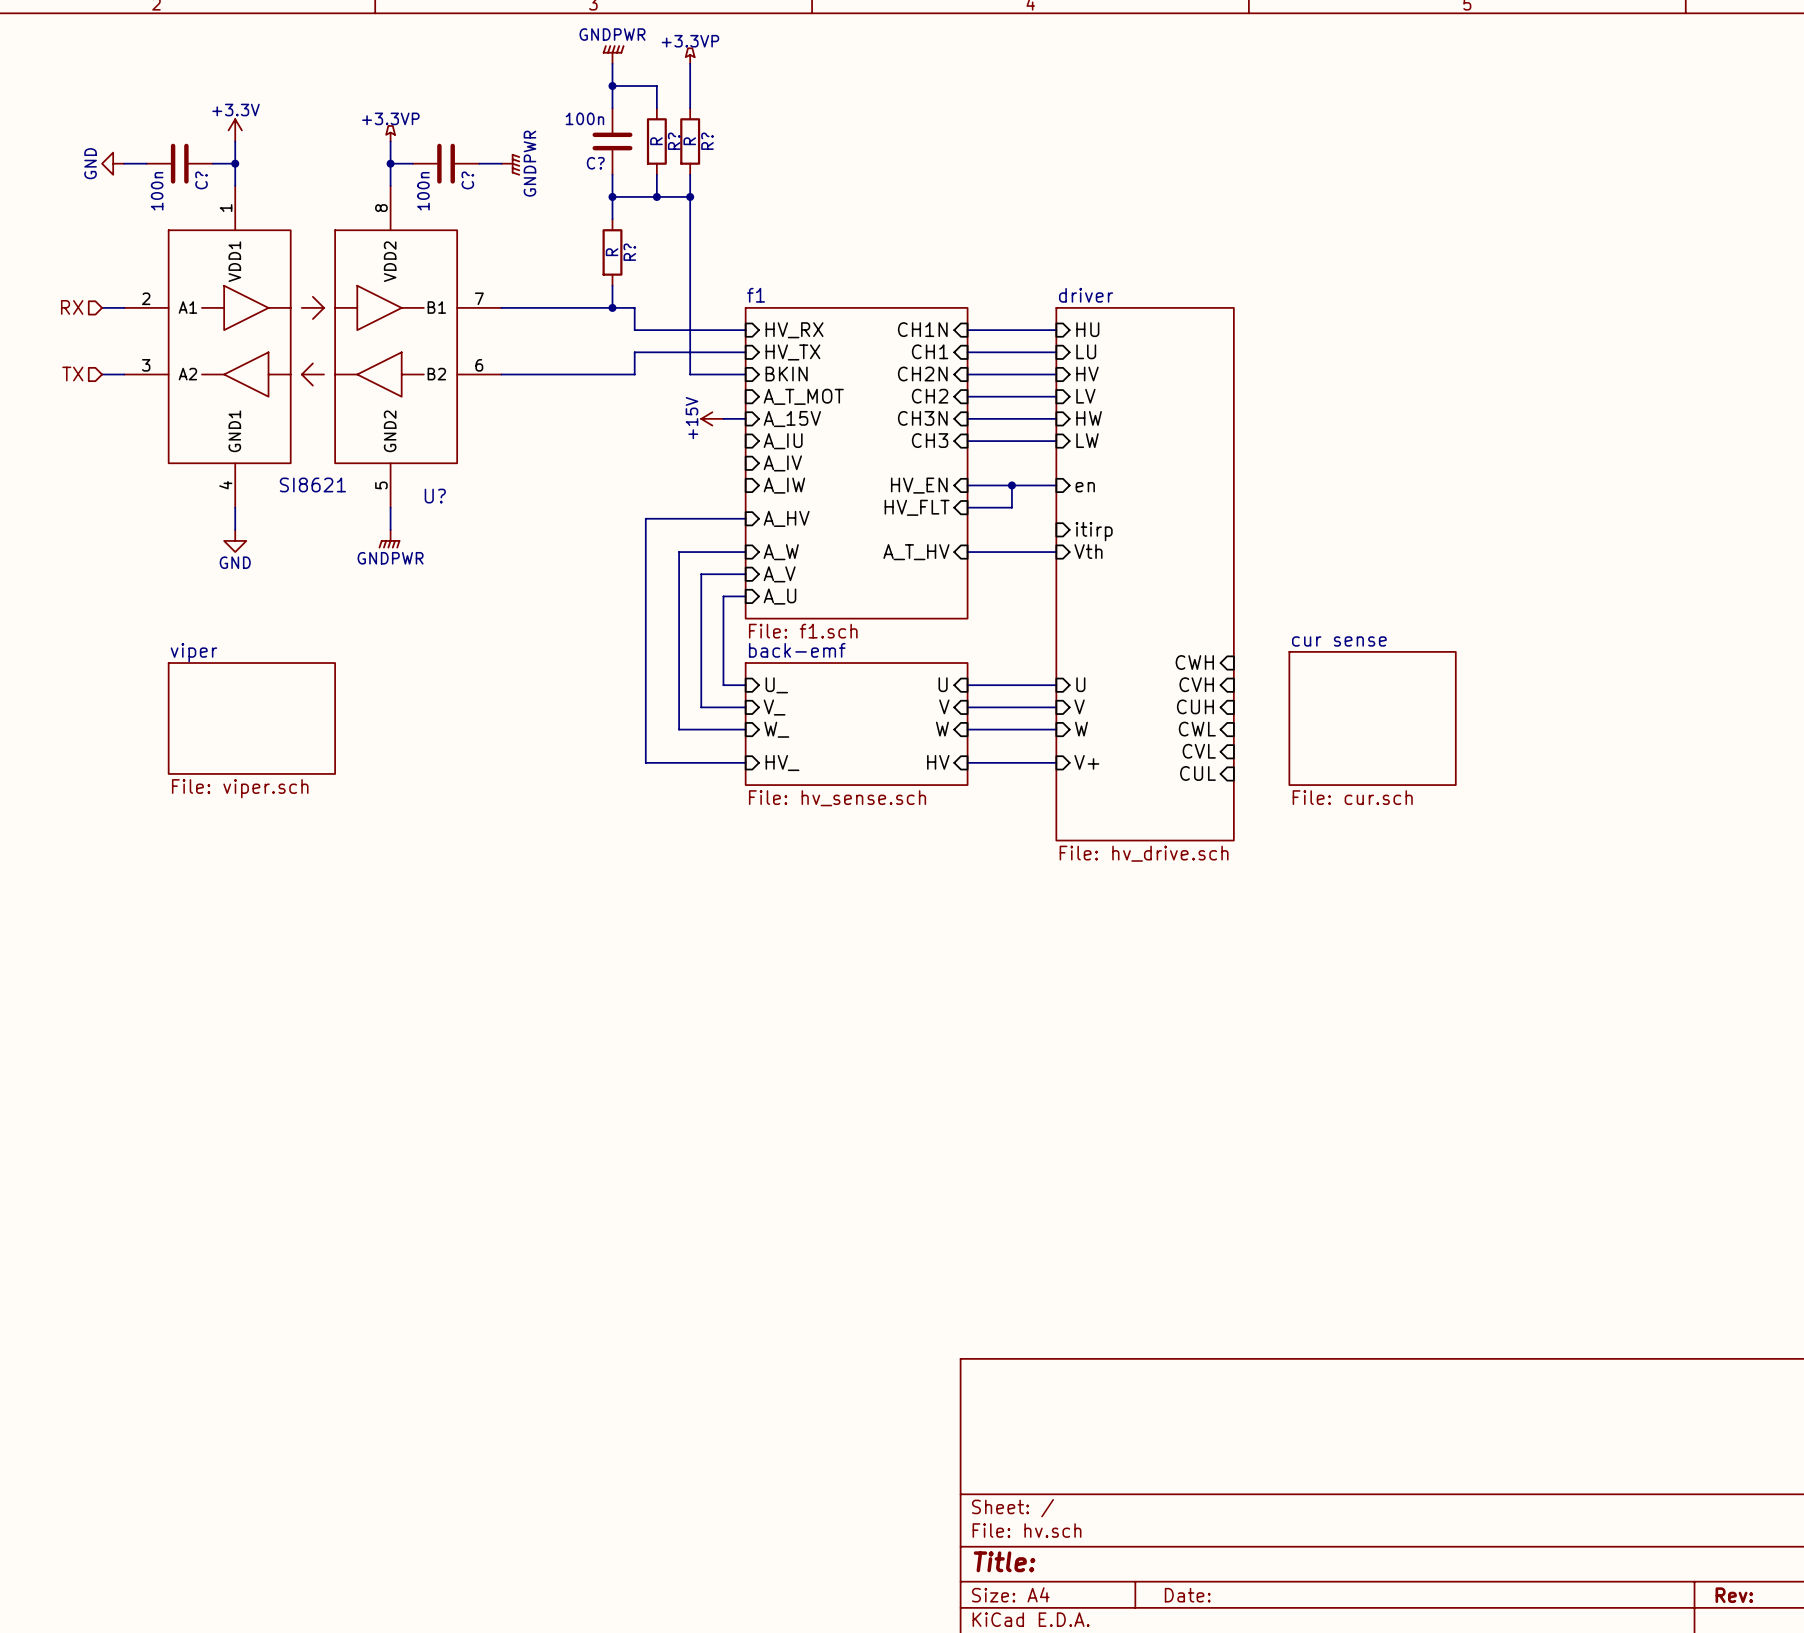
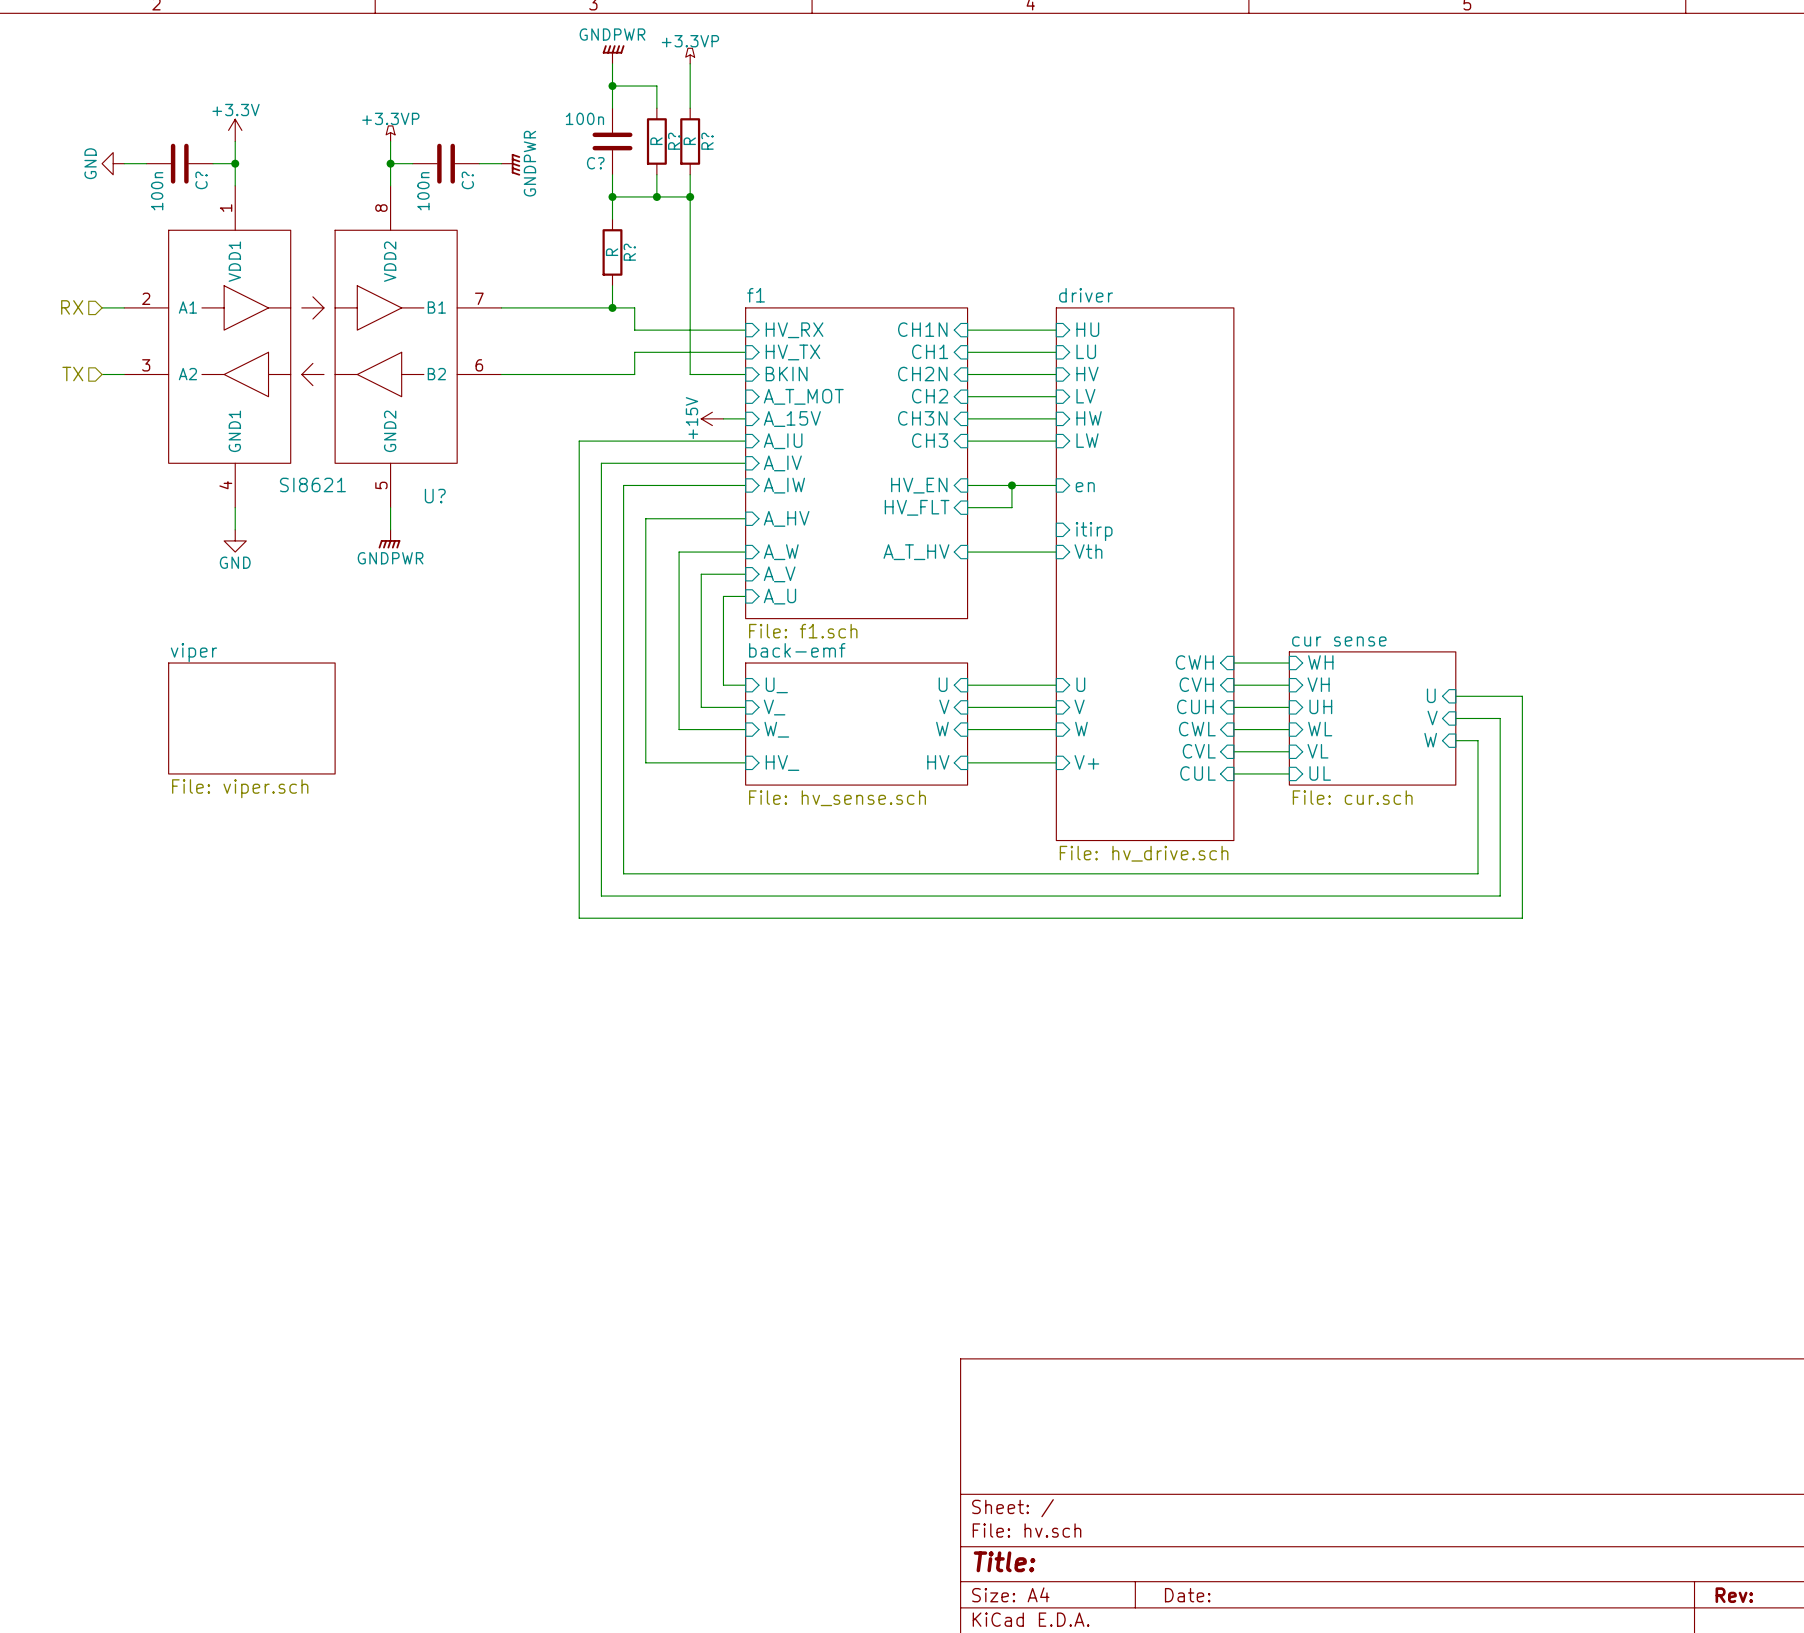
wire: none -> (745, 441) (579, 441) (579, 918) (1522, 918) (1522, 696) (1455, 696)
wire: none -> (745, 463) (601, 463) (601, 896) (1500, 896) (1500, 718) (1455, 718)
wire: none -> (745, 485) (623, 485) (623, 873) (1477, 873) (1477, 740) (1455, 740)
sheet pin: none -> WH (1320, 662)
wire: none -> (1233, 663) (1289, 663)
sheet pin: none -> VH (1318, 684)
wire: none -> (1233, 685) (1289, 685)
sheet pin: none -> U (1431, 695)
sheet pin: none -> UH (1320, 706)
wire: none -> (1233, 707) (1289, 707)
sheet pin: none -> V (1432, 717)
wire: none -> (1233, 729) (1289, 729)
sheet pin: none -> WL (1320, 729)
sheet pin: none -> W (1430, 740)
wire: none -> (1233, 751) (1289, 751)
sheet pin: none -> VL (1317, 751)
wire: none -> (1233, 773) (1289, 773)
sheet pin: none -> UL (1320, 773)

